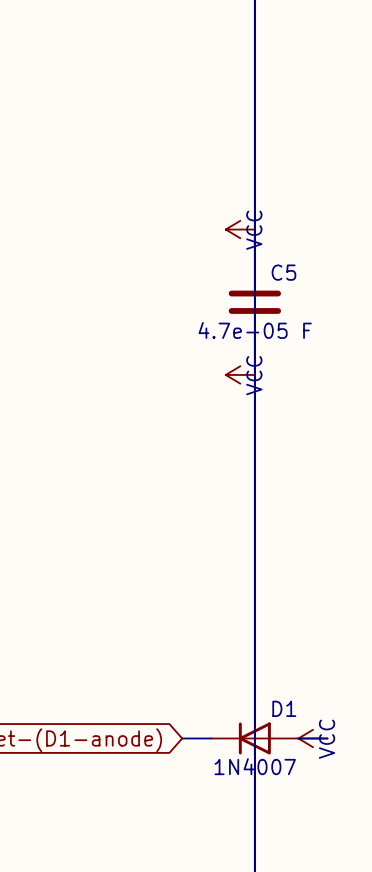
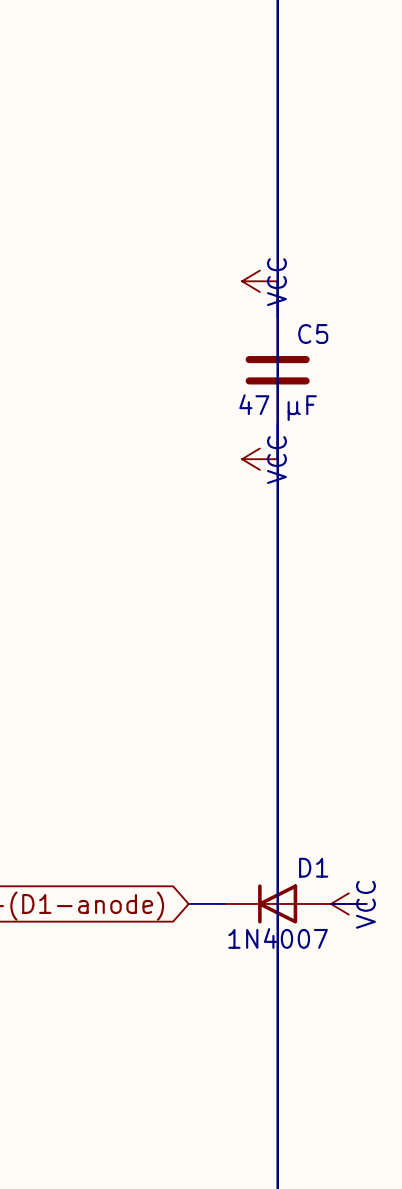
C5 value: 4.7e-05 F (255, 330) -> 47 µF (278, 407)

